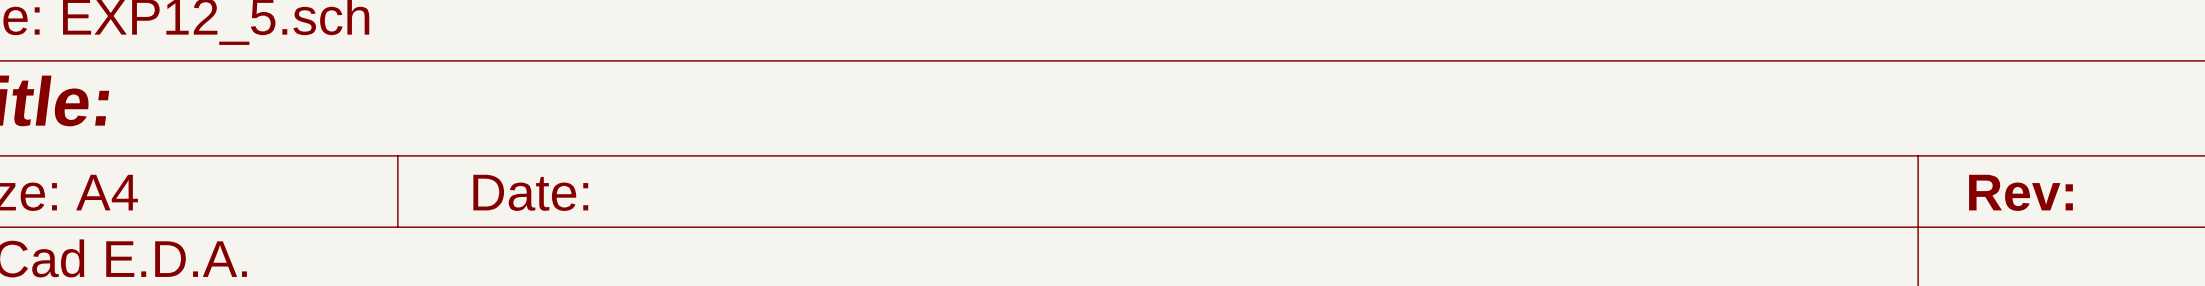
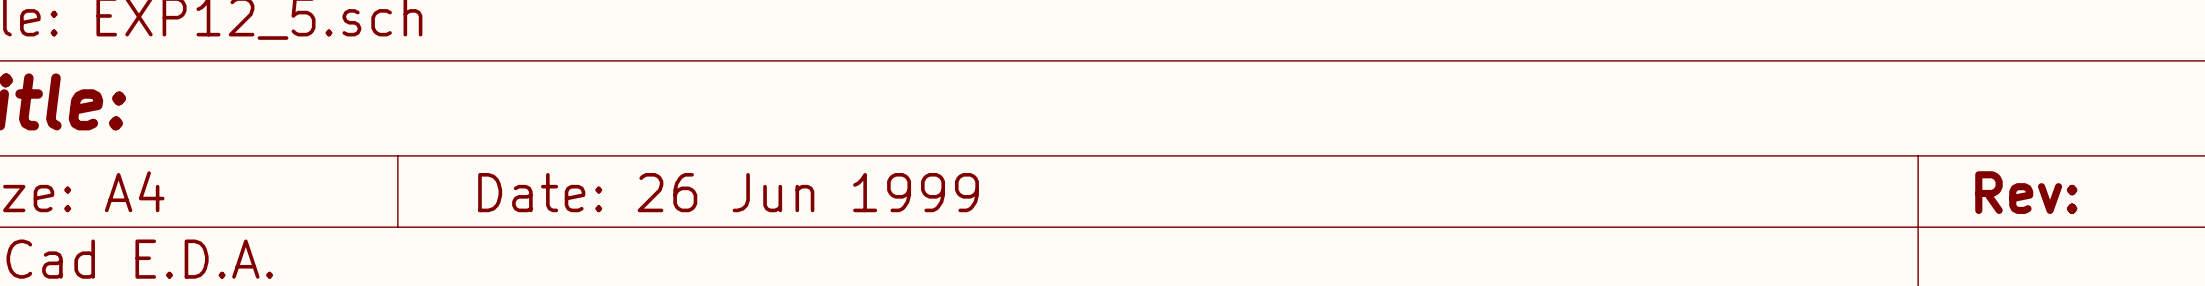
title block: Date: (530, 192) -> Date: 26 Jun 1999 (728, 192)

